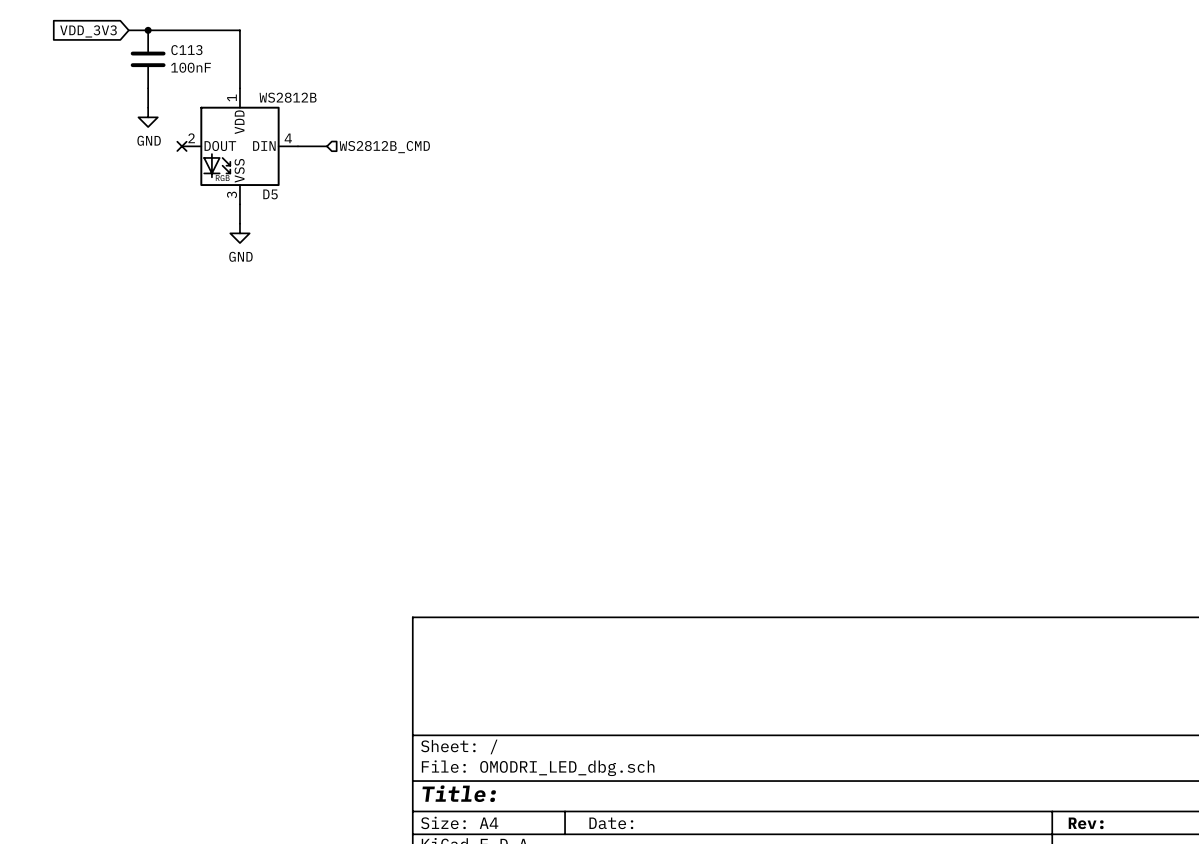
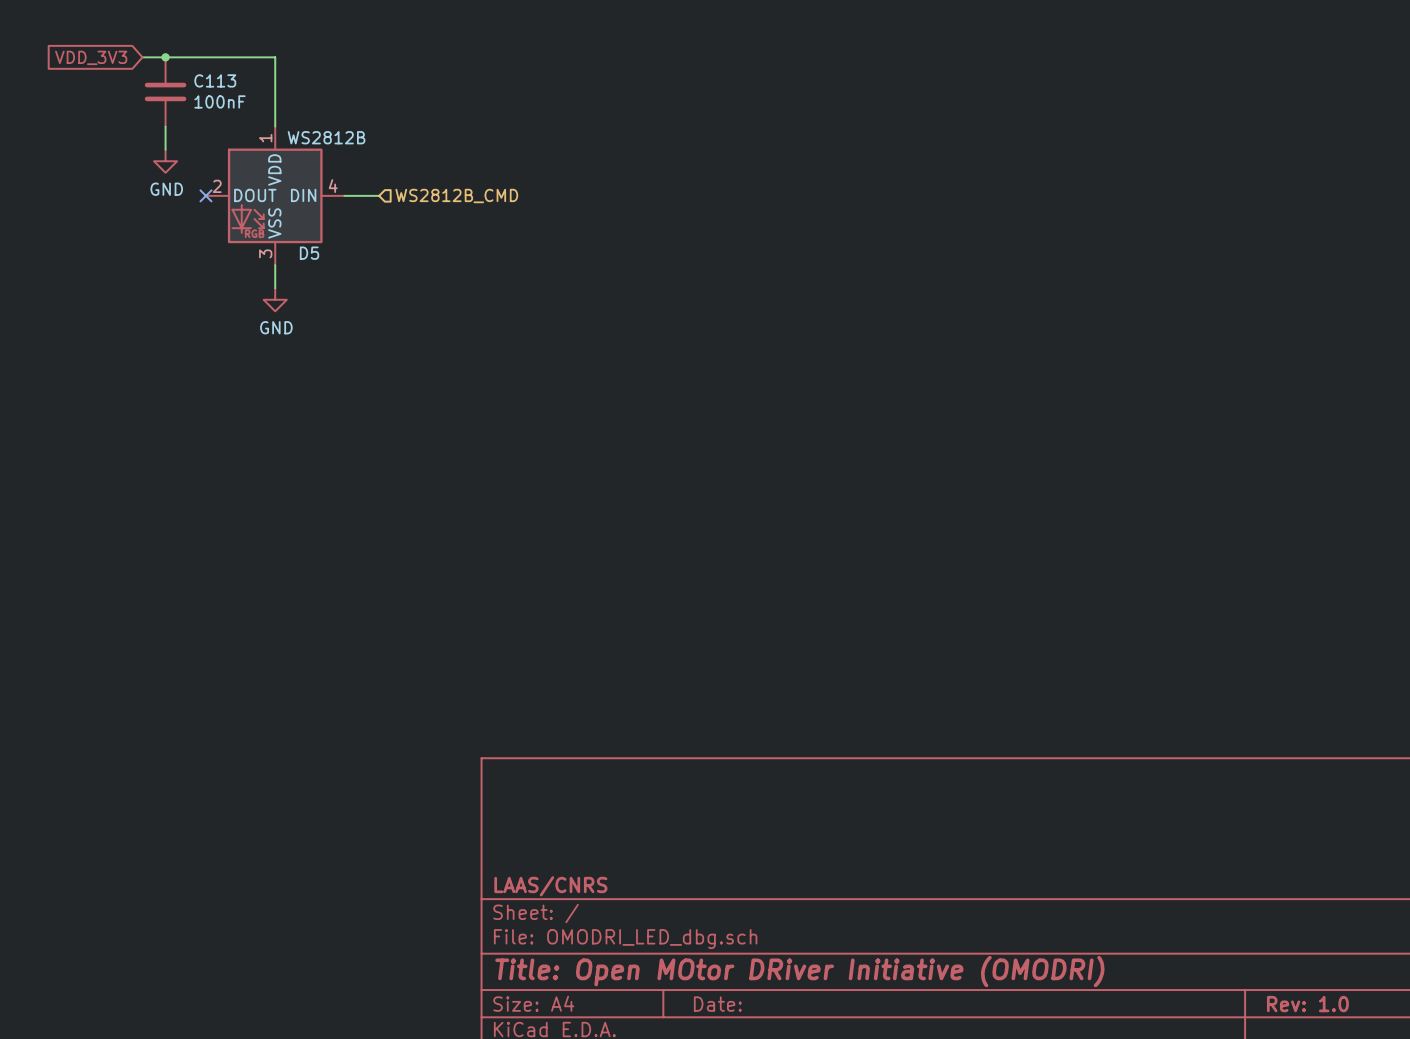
title block: none -> LAAS/CNRS (550, 886)
title block: Title: (459, 793) -> Title: Open MOtor DRiver Initiative (OMODRI) (799, 971)
title block: Rev: (1086, 823) -> Rev: 1.0 (1307, 1004)

